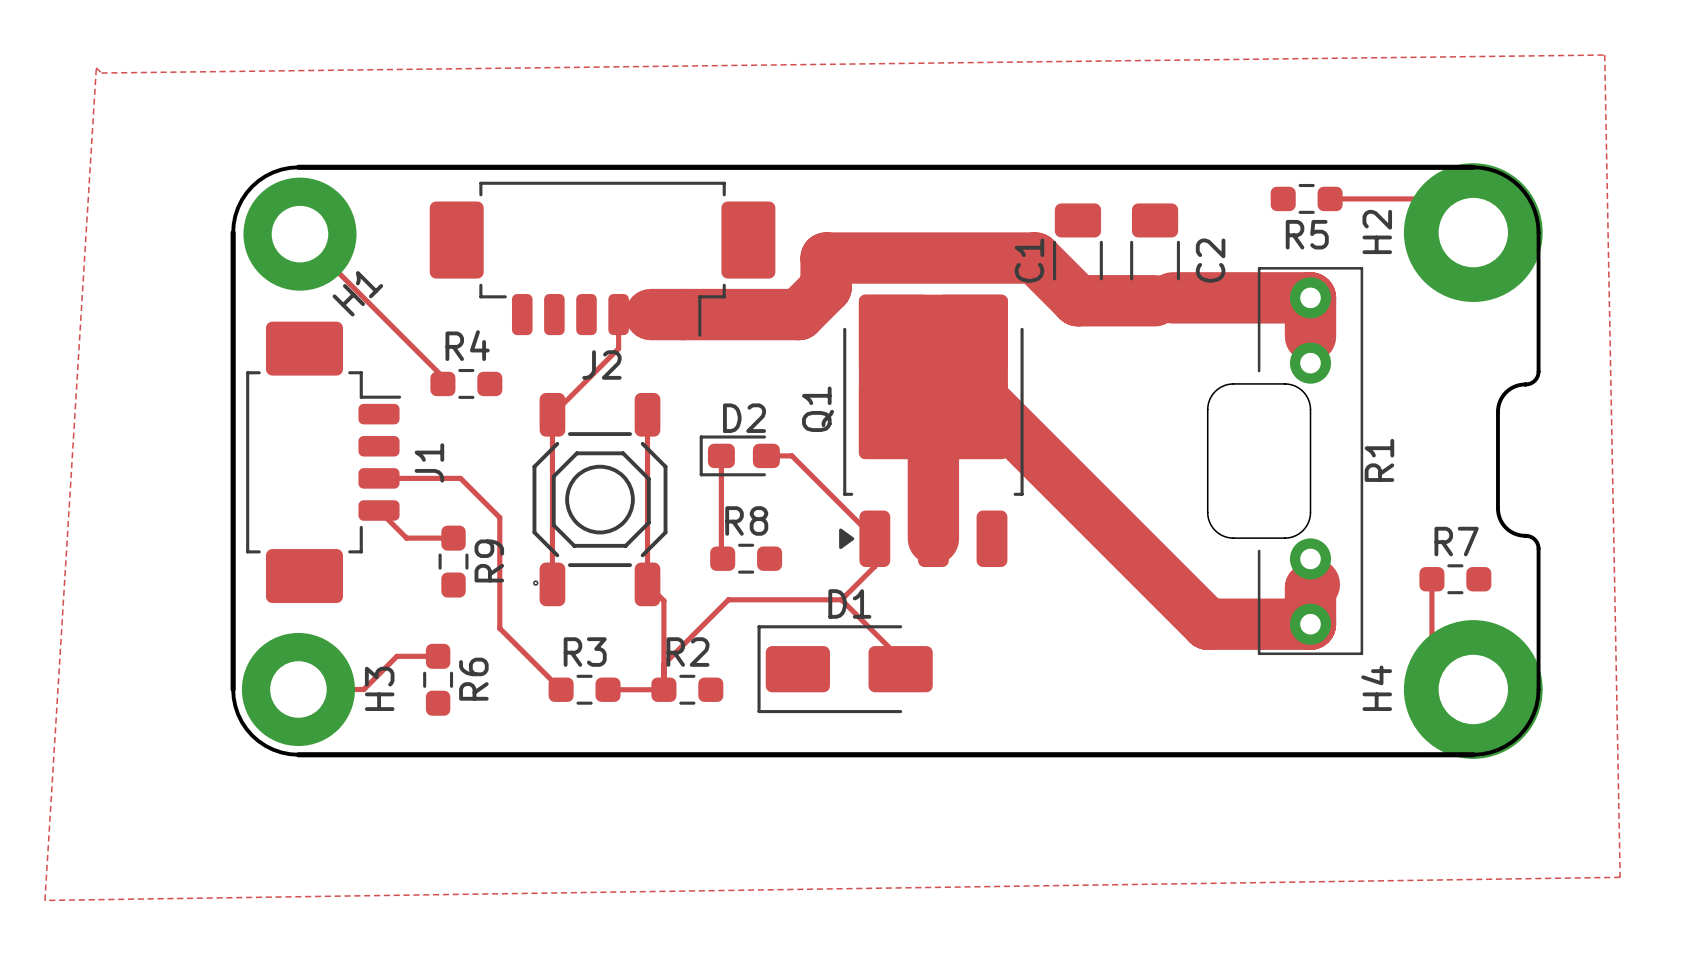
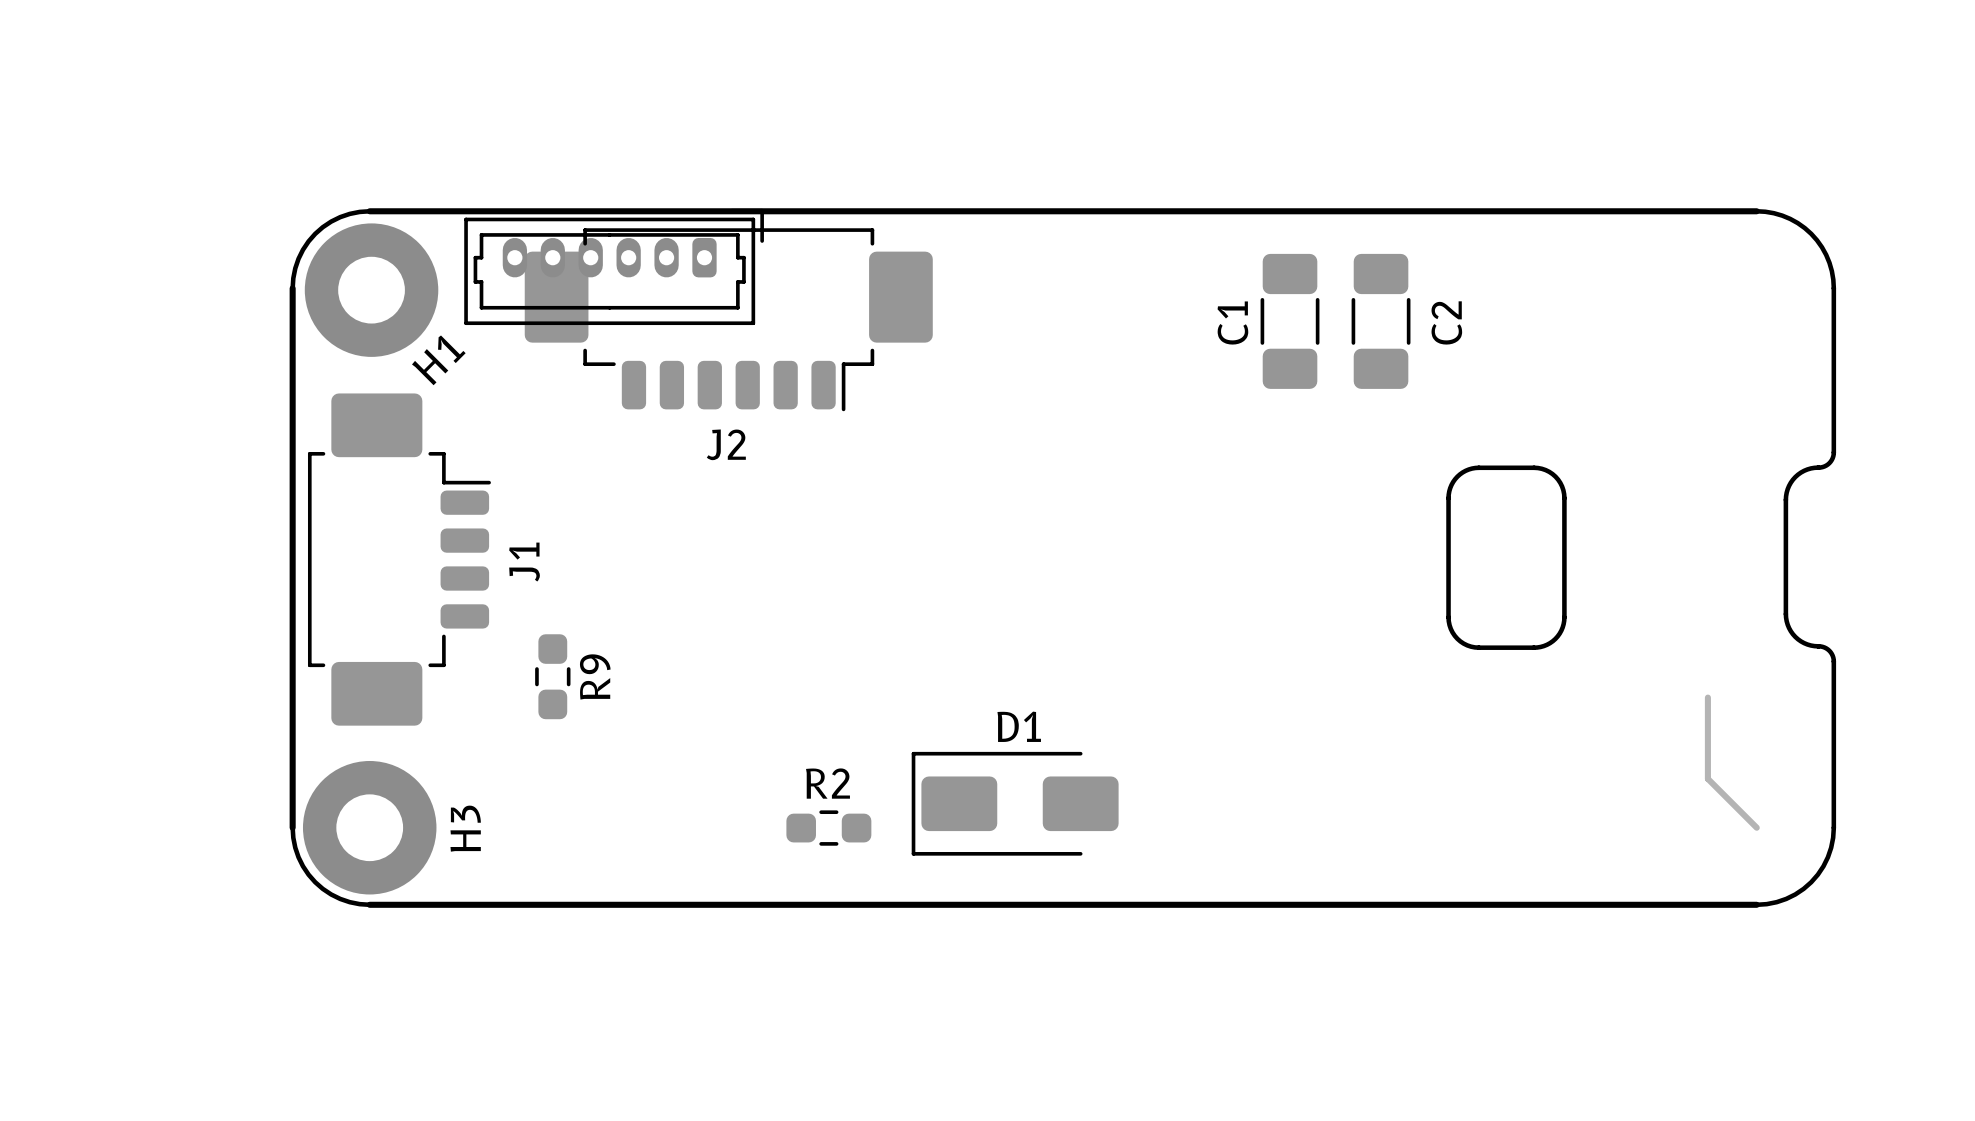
zone outline: (1604, 55) (101, 73) (96, 67) (44, 900) (1620, 877) (1604, 55) -> none
R5: (1306, 198) -> none
track: (1330, 198) (1439, 198) (1473, 232) -> none
part: none -> (614, 266)
H2: (1473, 232) -> none
track: (299, 234) (442, 377) (442, 383) -> none
track: (1172, 297) (1310, 297) (1310, 336) -> none
track: (1155, 300) (1077, 300) (1035, 258) (826, 258) (826, 287) (798, 314) (650, 314) -> none
track: (618, 314) (618, 348) (552, 414) (552, 584) -> none
R4: (466, 383) -> none
board edge: none -> (1478, 467) (1541, 468) (1552, 474) (1562, 486) (1564, 498) (1564, 620) (1557, 636) (1543, 646) (1474, 647) (1460, 641) (1450, 628) (1448, 617) (1449, 491) (1453, 481) (1459, 474) (1468, 469) (1478, 467)
track: (647, 414) (647, 584) (663, 600) (663, 689) (608, 689) -> none
Q1: (931, 430) -> none
track: (721, 455) (722, 558) -> none
D2: (739, 455) -> none
track: (766, 455) (791, 455) (874, 538) (874, 566) (841, 599) -> none
R1: (1285, 461) -> none
track: (378, 478) (460, 478) (499, 517) (499, 628) (561, 689) -> none
part: (599, 499) -> none
track: (378, 510) (406, 538) (453, 538) -> none
track: (933, 538) (933, 376) (960, 376) (1207, 624) (1310, 624) (1310, 588) (1314, 584) -> none
R8: (746, 558) -> none
R7: (1455, 579) -> none
track: (841, 599) (728, 599) (663, 664) -> none
track: (841, 599) (900, 658) (900, 669) -> none
track: (438, 656) (396, 656) (363, 689) (298, 689) -> none
R6: (438, 679) -> none
R3: (584, 689) -> none
H4: (1473, 689) -> none

